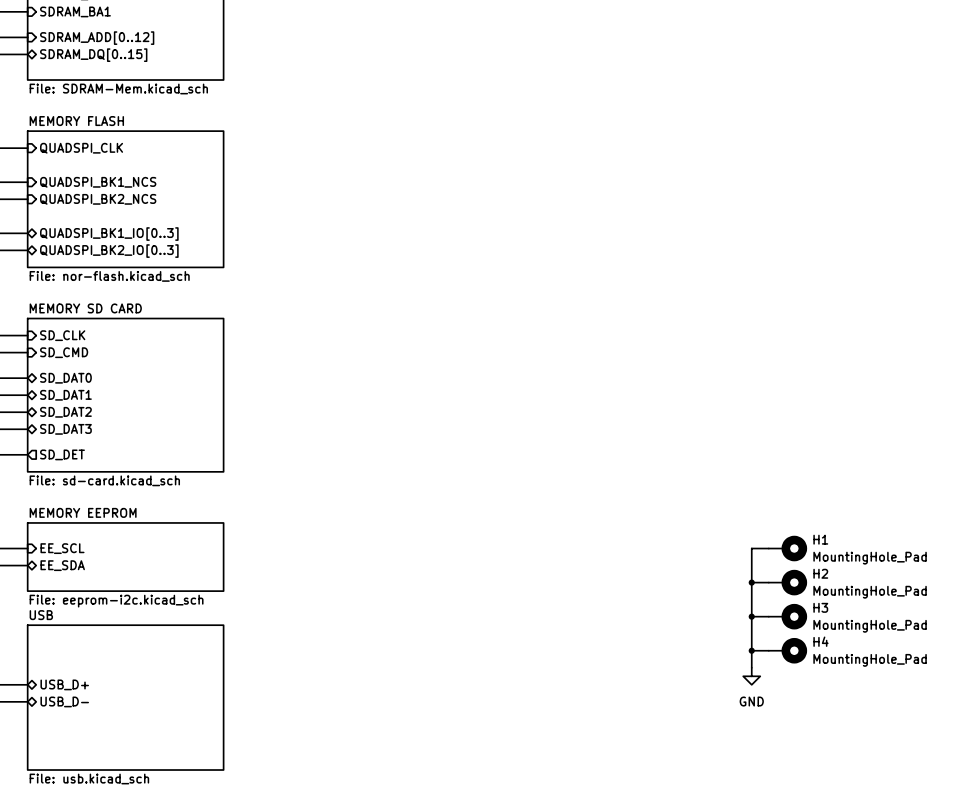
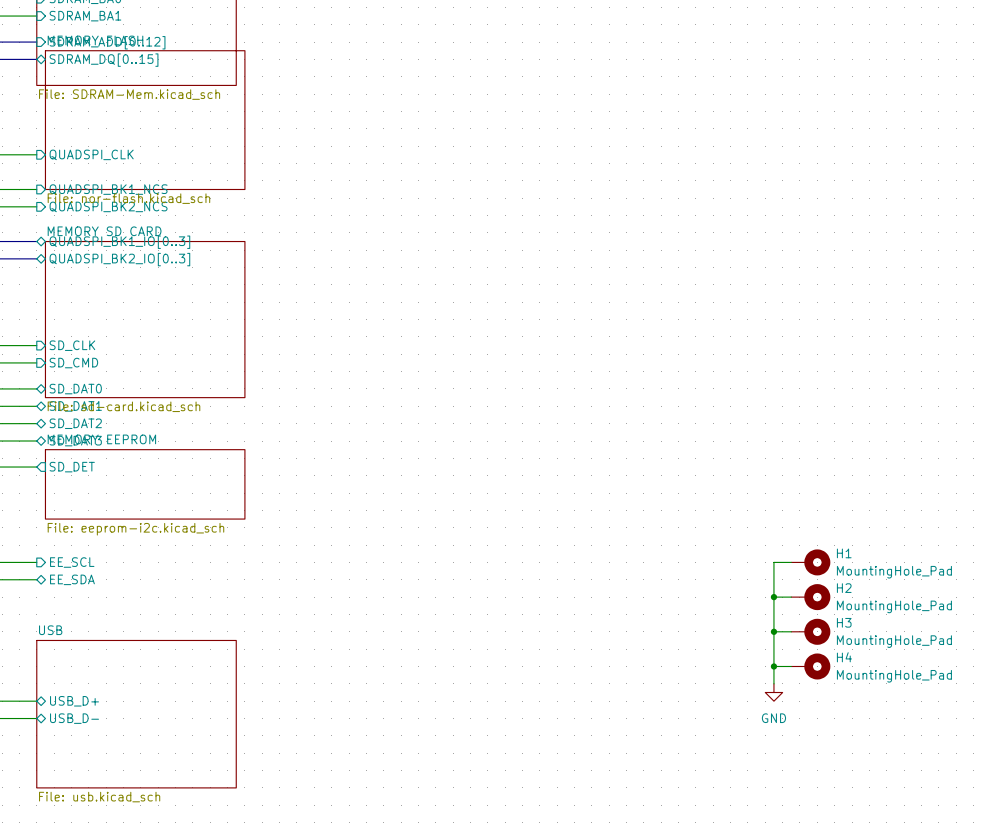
sheet MEMORY FLASH position: (125, 199) -> (145, 120)
sheet MEMORY SD CARD position: (125, 395) -> (145, 319)
sheet MEMORY EEPROM position: (125, 557) -> (145, 484)

